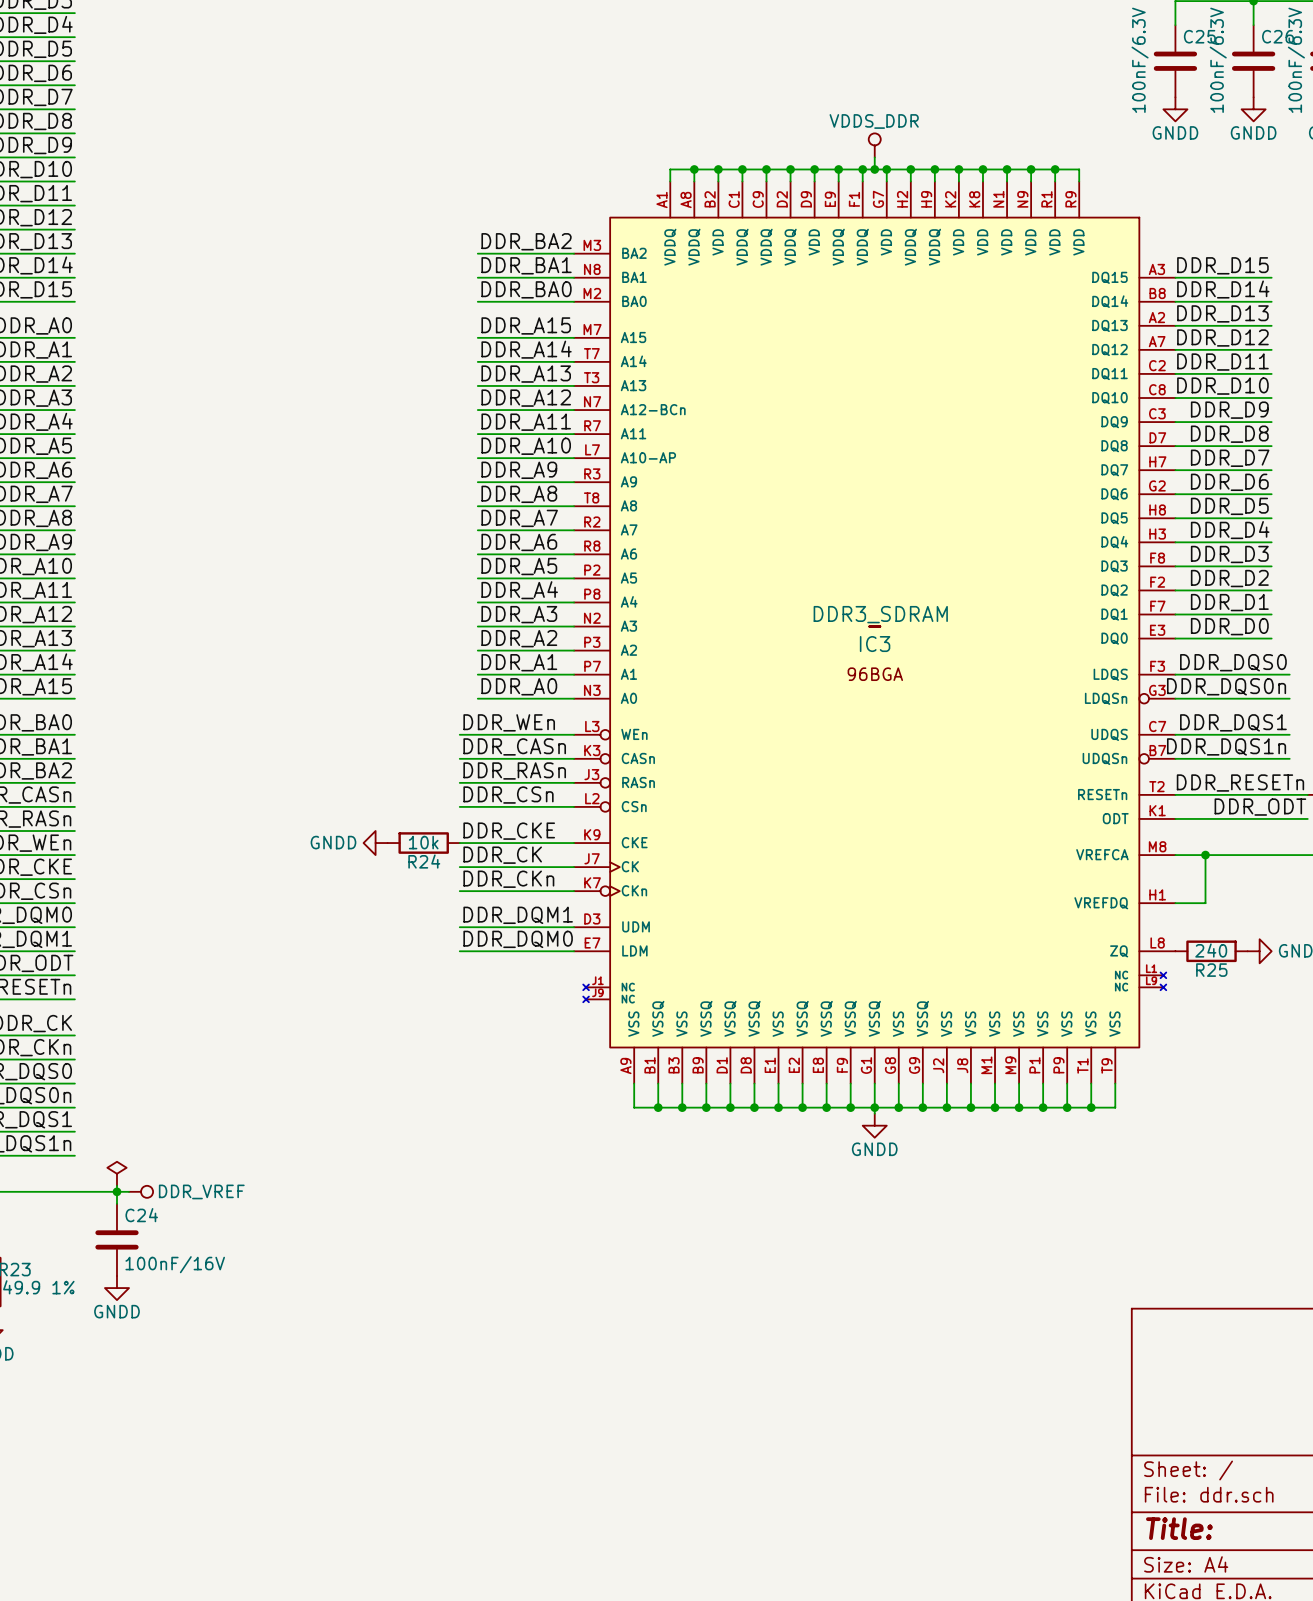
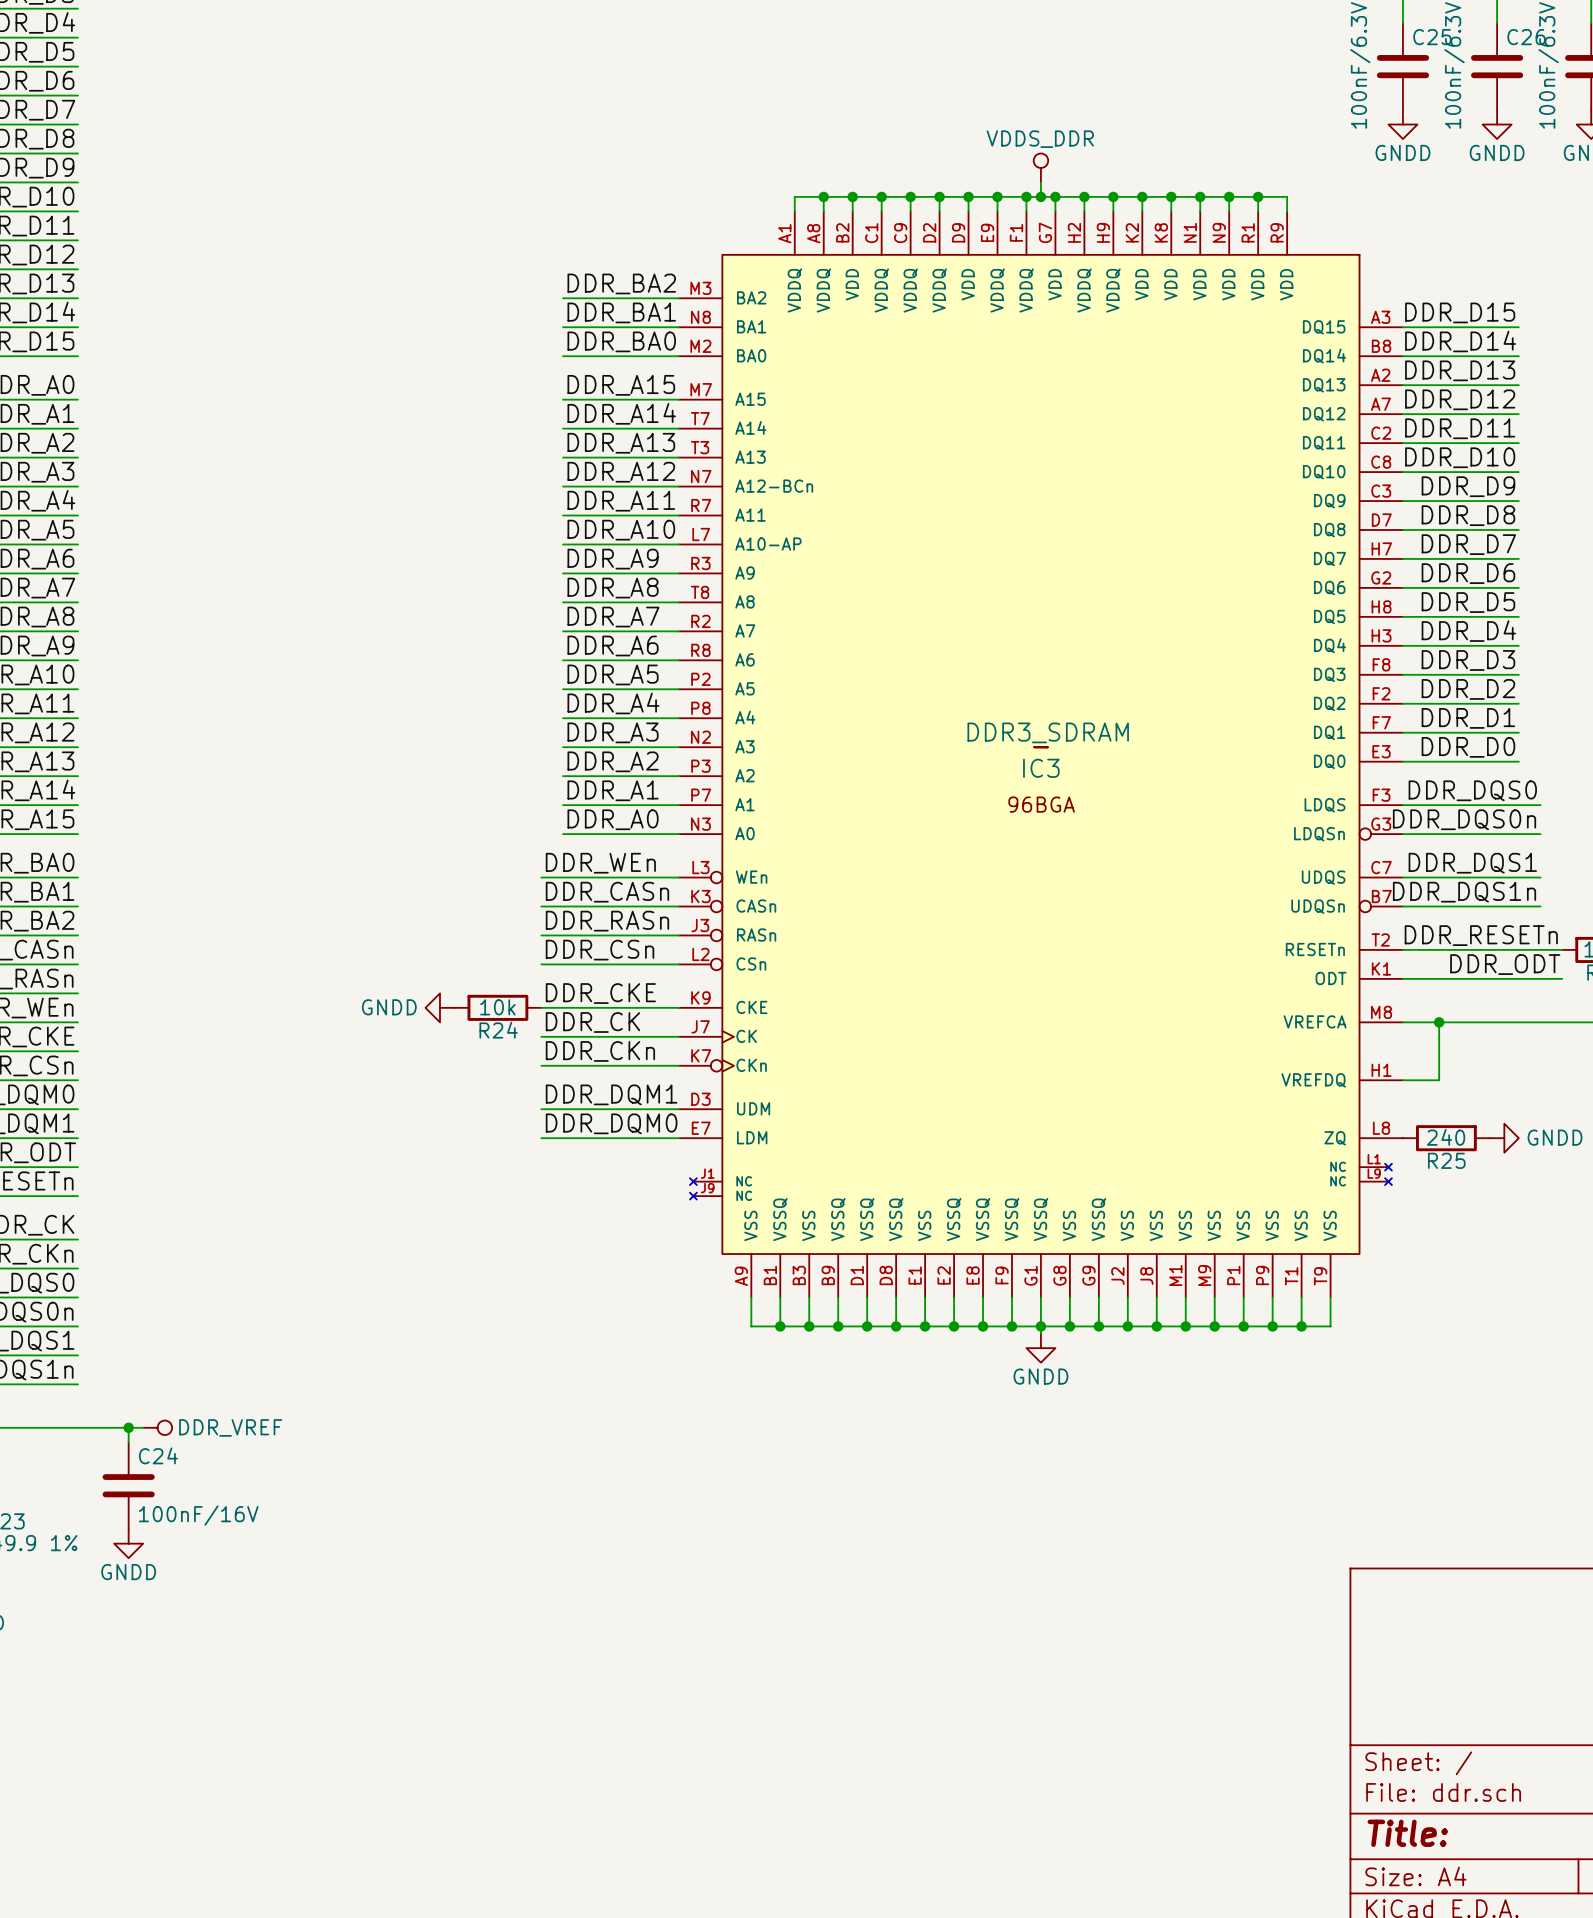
power symbol: (116, 1173) -> none

